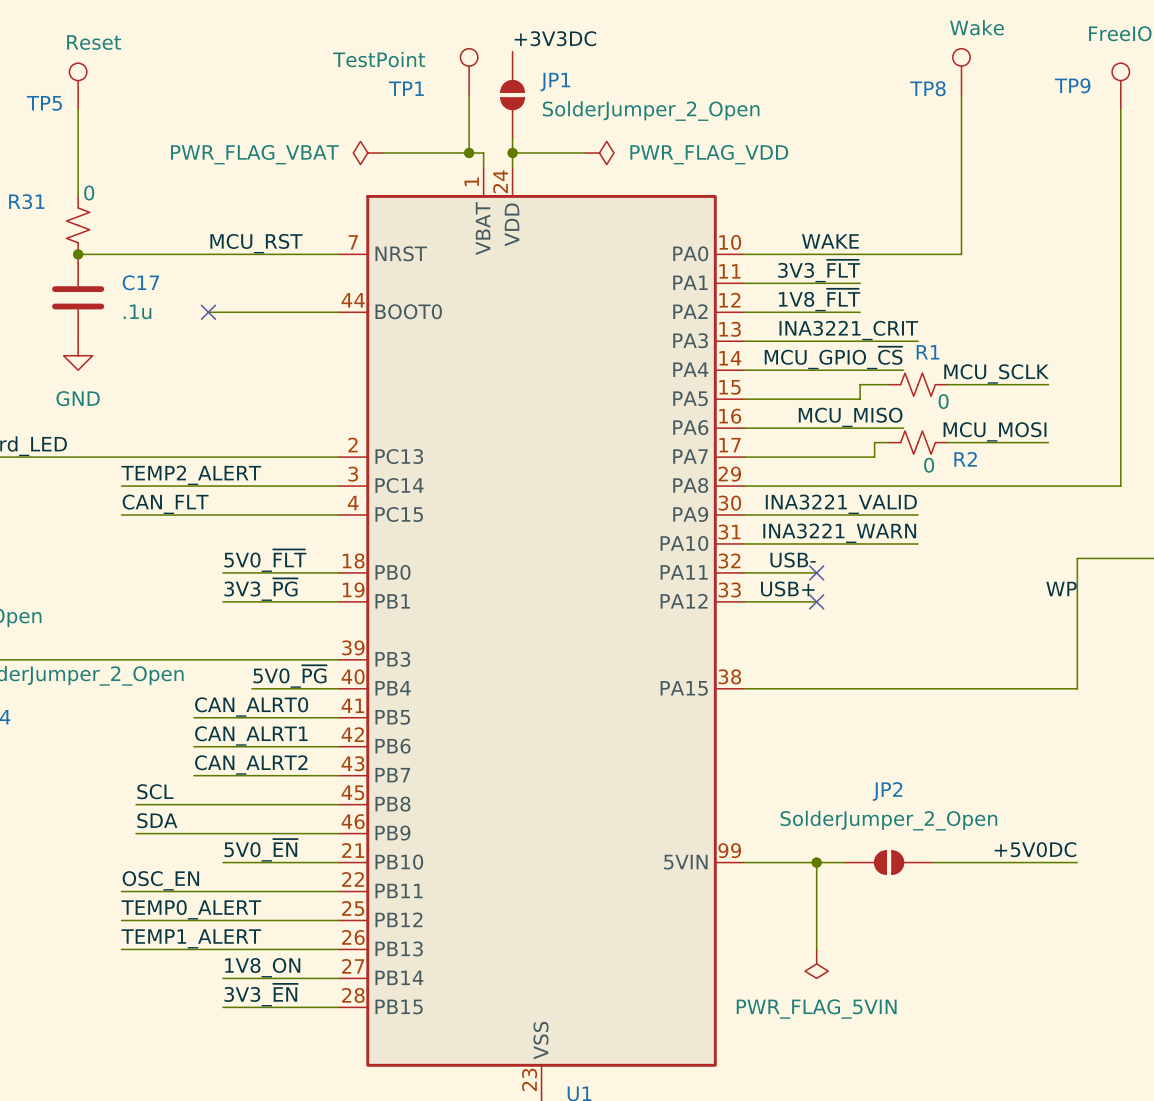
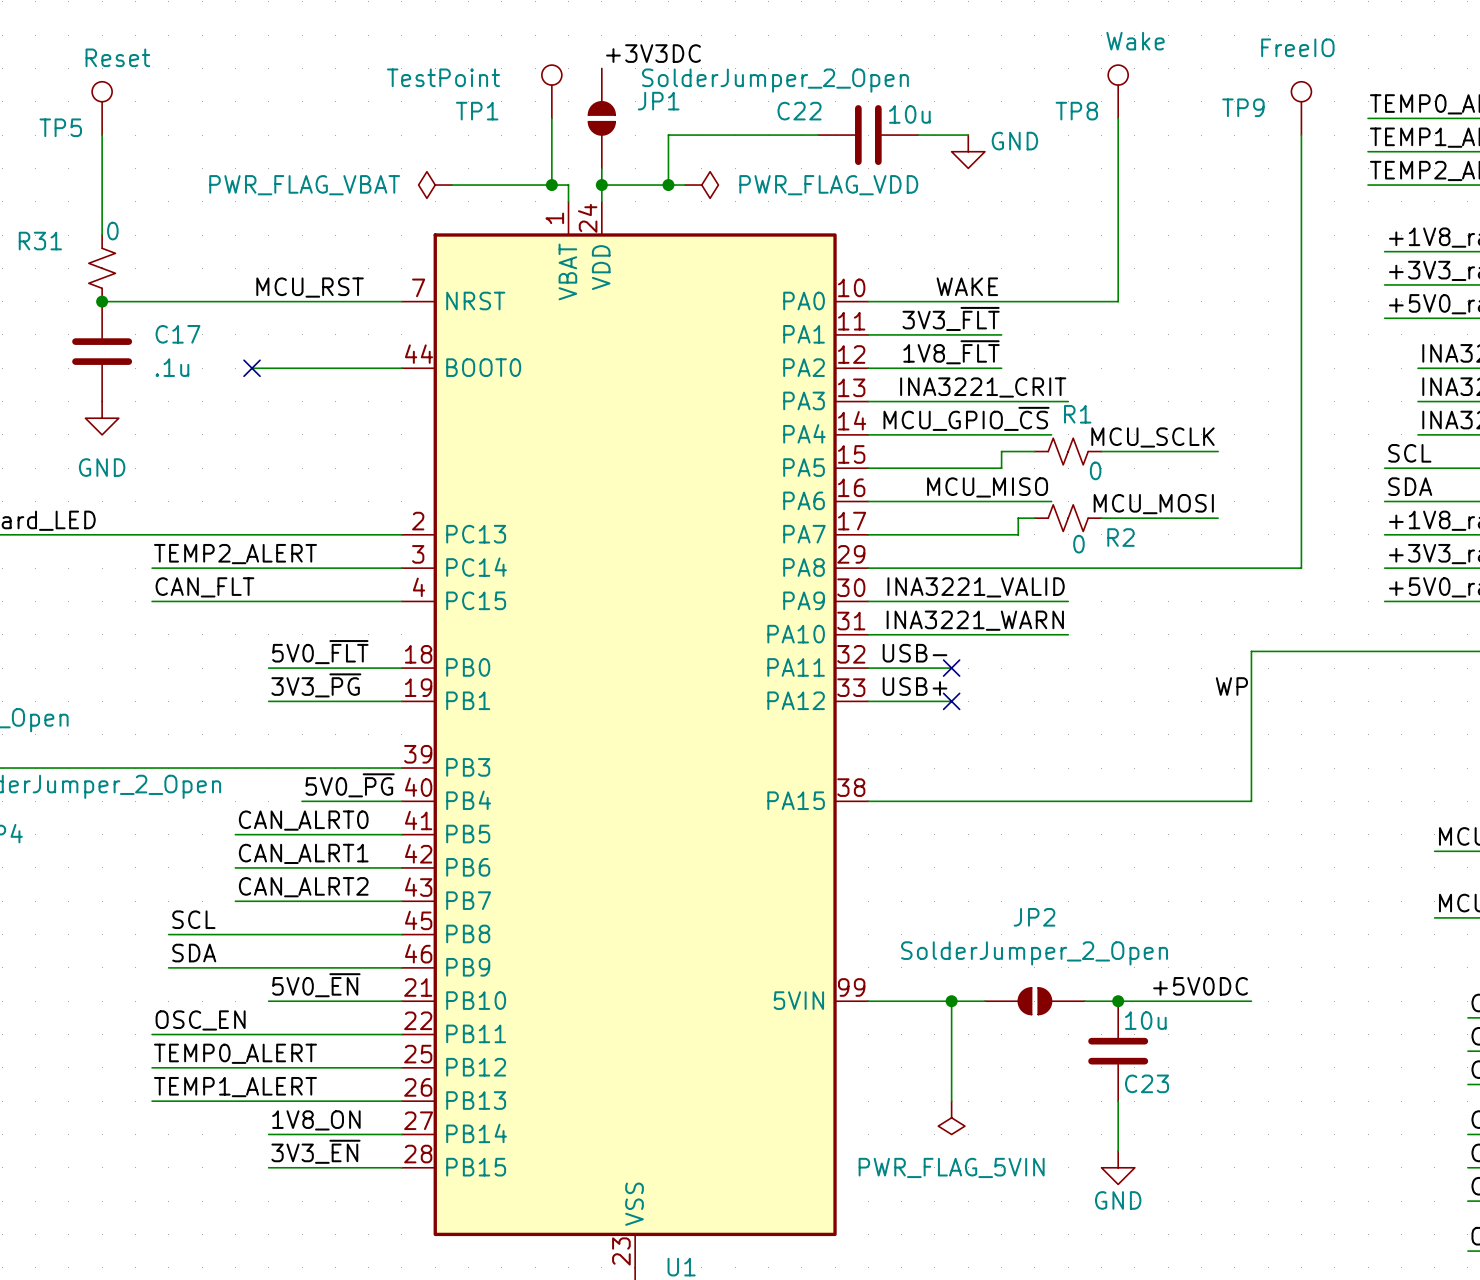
wire: none -> (818, 135) (668, 135) (668, 185)
C22: none -> 10u (868, 135)
wire: none -> (918, 135) (968, 135)
JP1 value position: SolderJumper_2_Open (651, 111) -> SolderJumper_2_Open (775, 80)
power symbol: none -> GND (968, 151)
junction: none -> (668, 185)
junction: none -> (1118, 1001)
C23: none -> 10u (1118, 1051)
wire: none -> (1118, 1101) (1118, 1151)
power symbol: none -> GND (1118, 1167)

